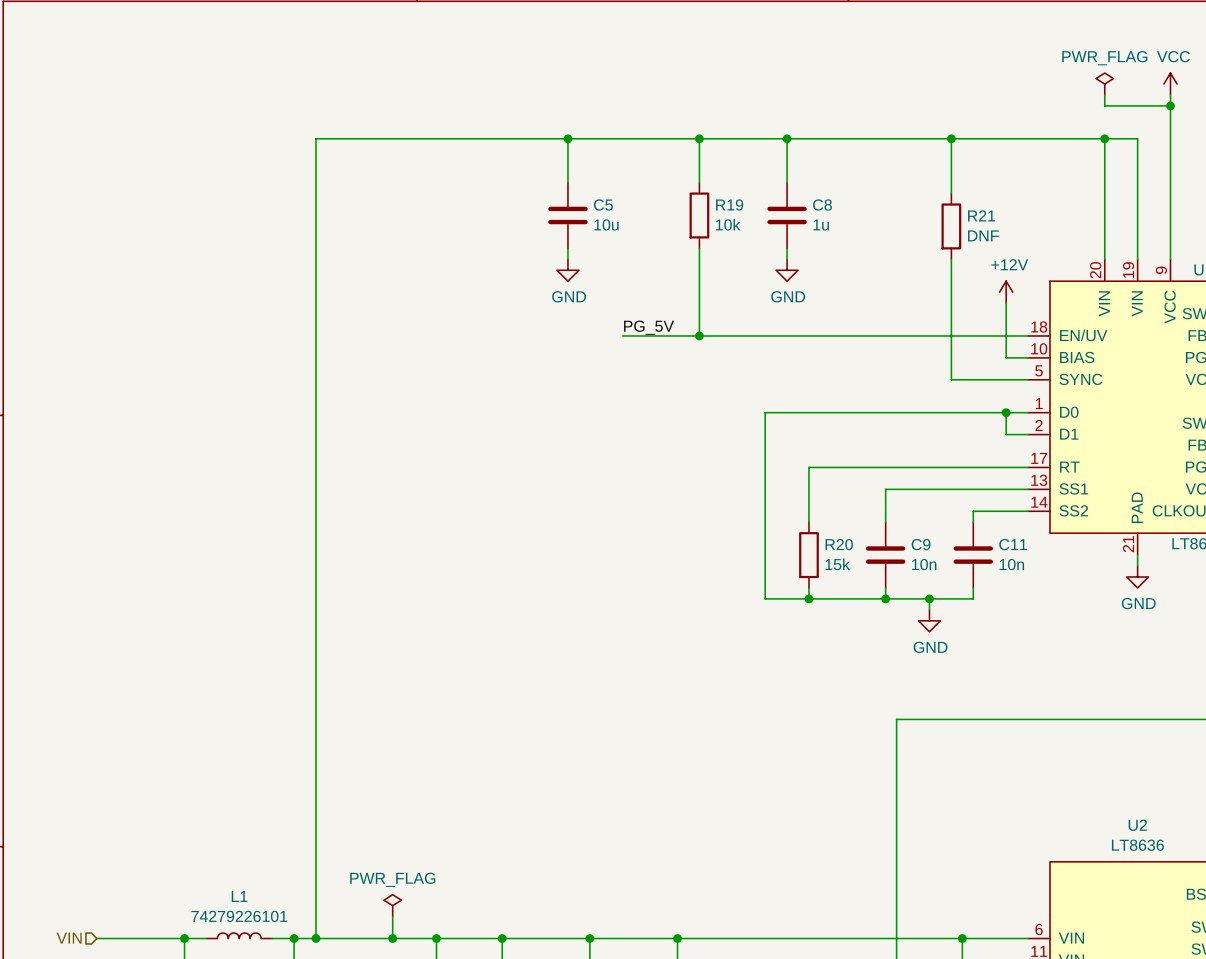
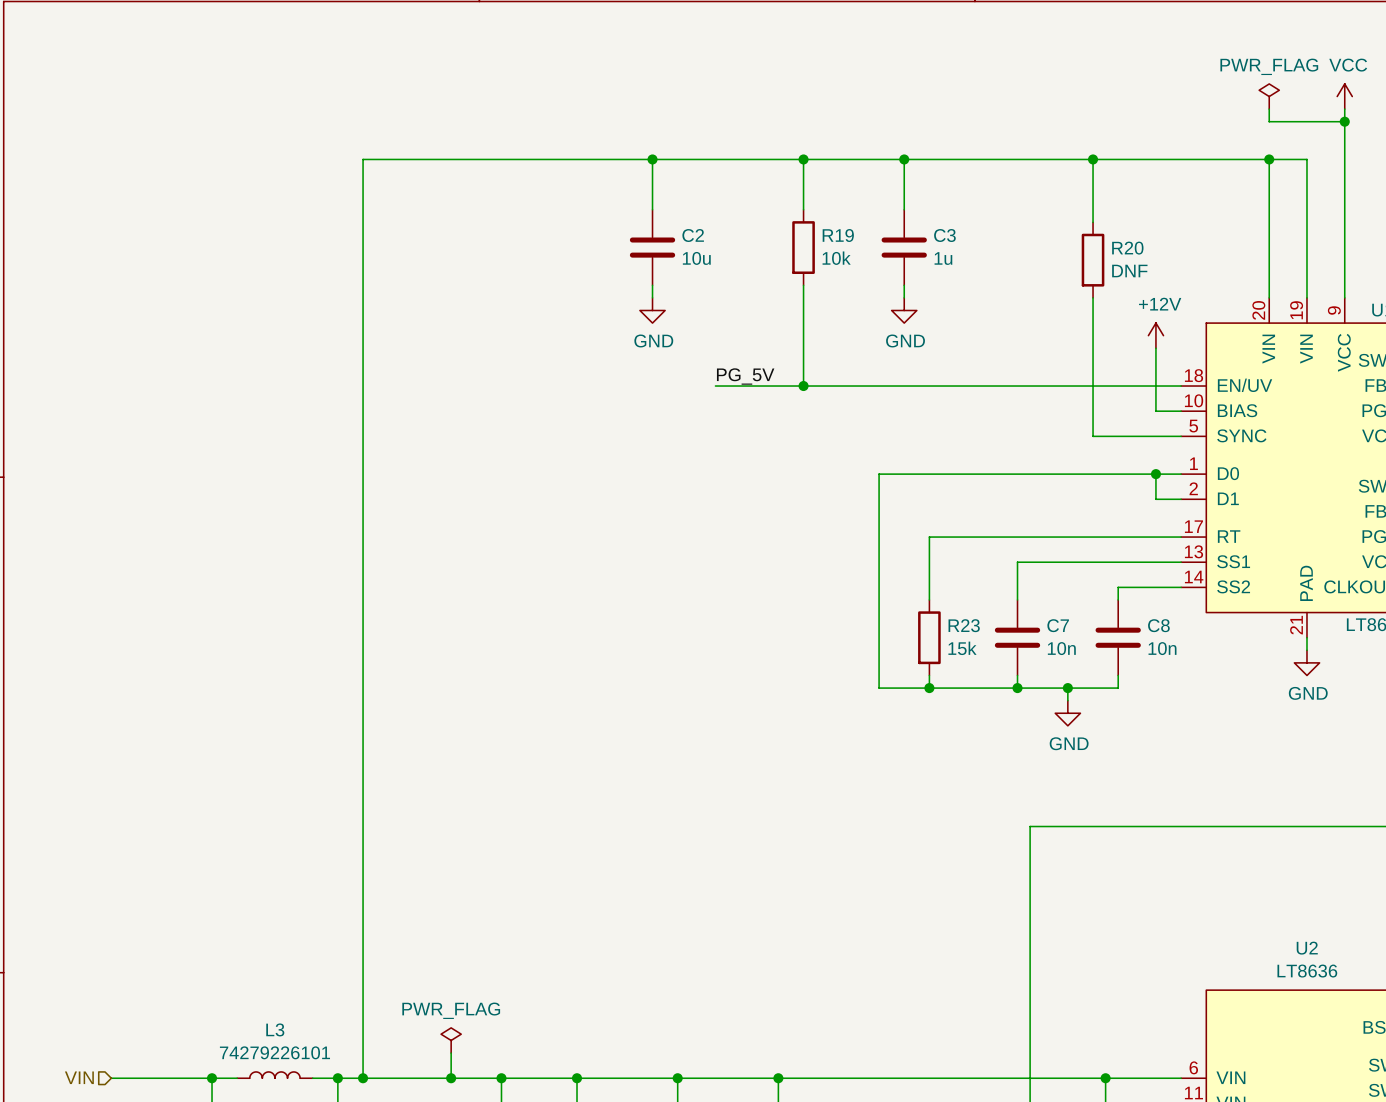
C5 name: C5 (603, 204) -> C2 (693, 235)
C8 name: C8 (822, 204) -> C3 (944, 235)
R21 name: R21 (981, 215) -> R20 (1127, 248)
R20 name: R20 (839, 544) -> R23 (964, 625)
C9 name: C9 (921, 544) -> C7 (1058, 625)
C11 name: C11 (1013, 544) -> C8 (1158, 625)
L1 name: L1 (239, 896) -> L3 (275, 1029)

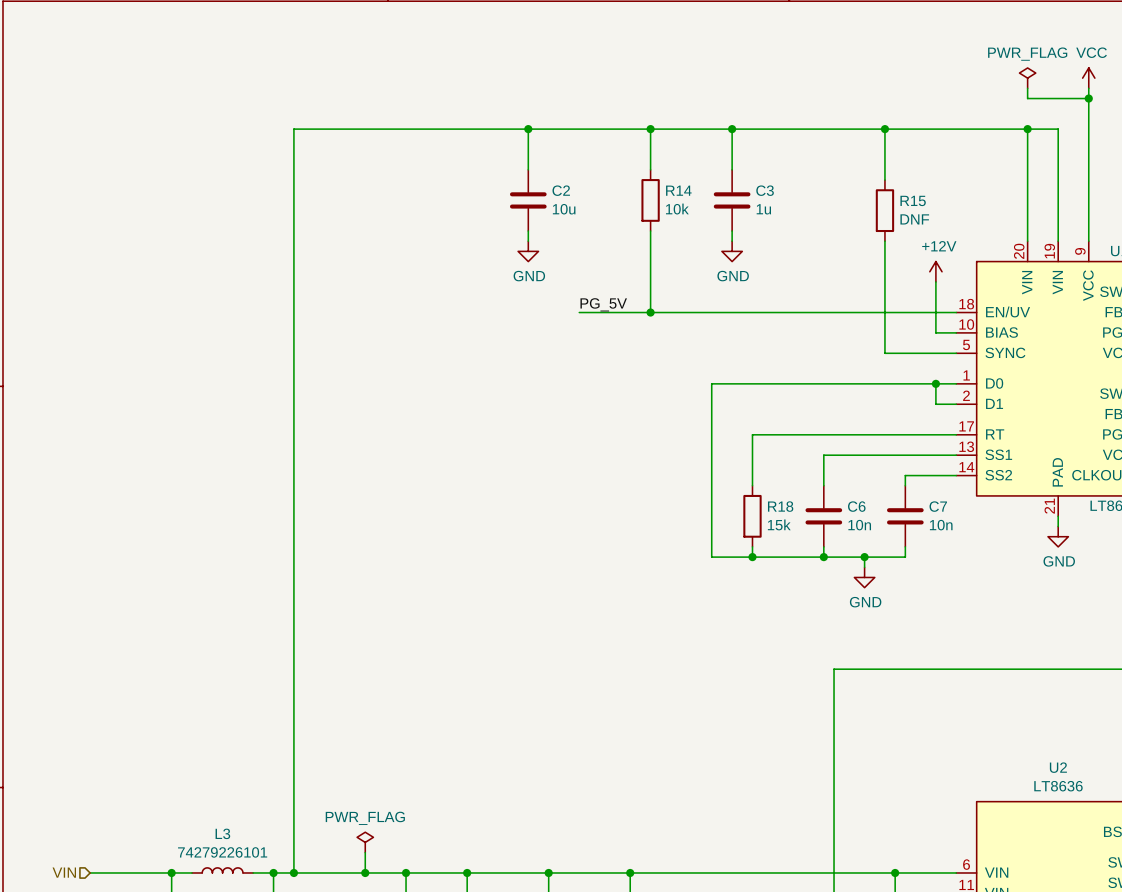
R19 name: R19 (838, 235) -> R14 (678, 190)
R20 name: R20 (1127, 248) -> R15 (913, 200)
R23 name: R23 (964, 625) -> R18 (780, 506)
C7 name: C7 (1058, 625) -> C6 (856, 506)
C8 name: C8 (1158, 625) -> C7 (938, 506)

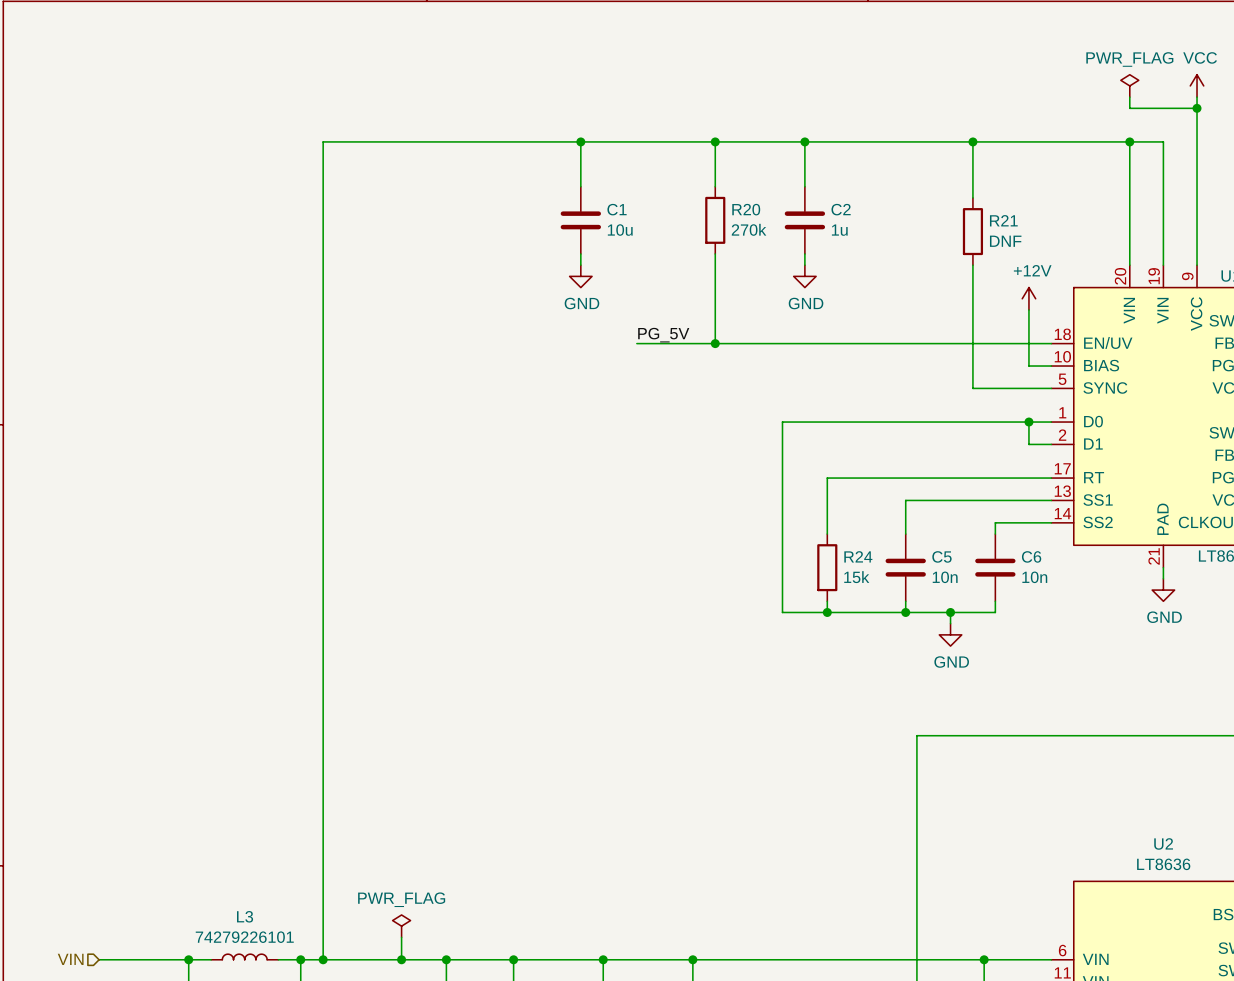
C2 name: C2 (561, 190) -> C1 (617, 209)
R14 name: R14 (678, 190) -> R20 (746, 209)
C3 name: C3 (765, 190) -> C2 (841, 209)
R15 name: R15 (913, 200) -> R21 (1003, 220)
R14 value: 10k (677, 209) -> 270k (749, 229)
R18 name: R18 (780, 506) -> R24 (858, 556)
C6 name: C6 (856, 506) -> C5 (941, 556)
C7 name: C7 (938, 506) -> C6 (1031, 556)

